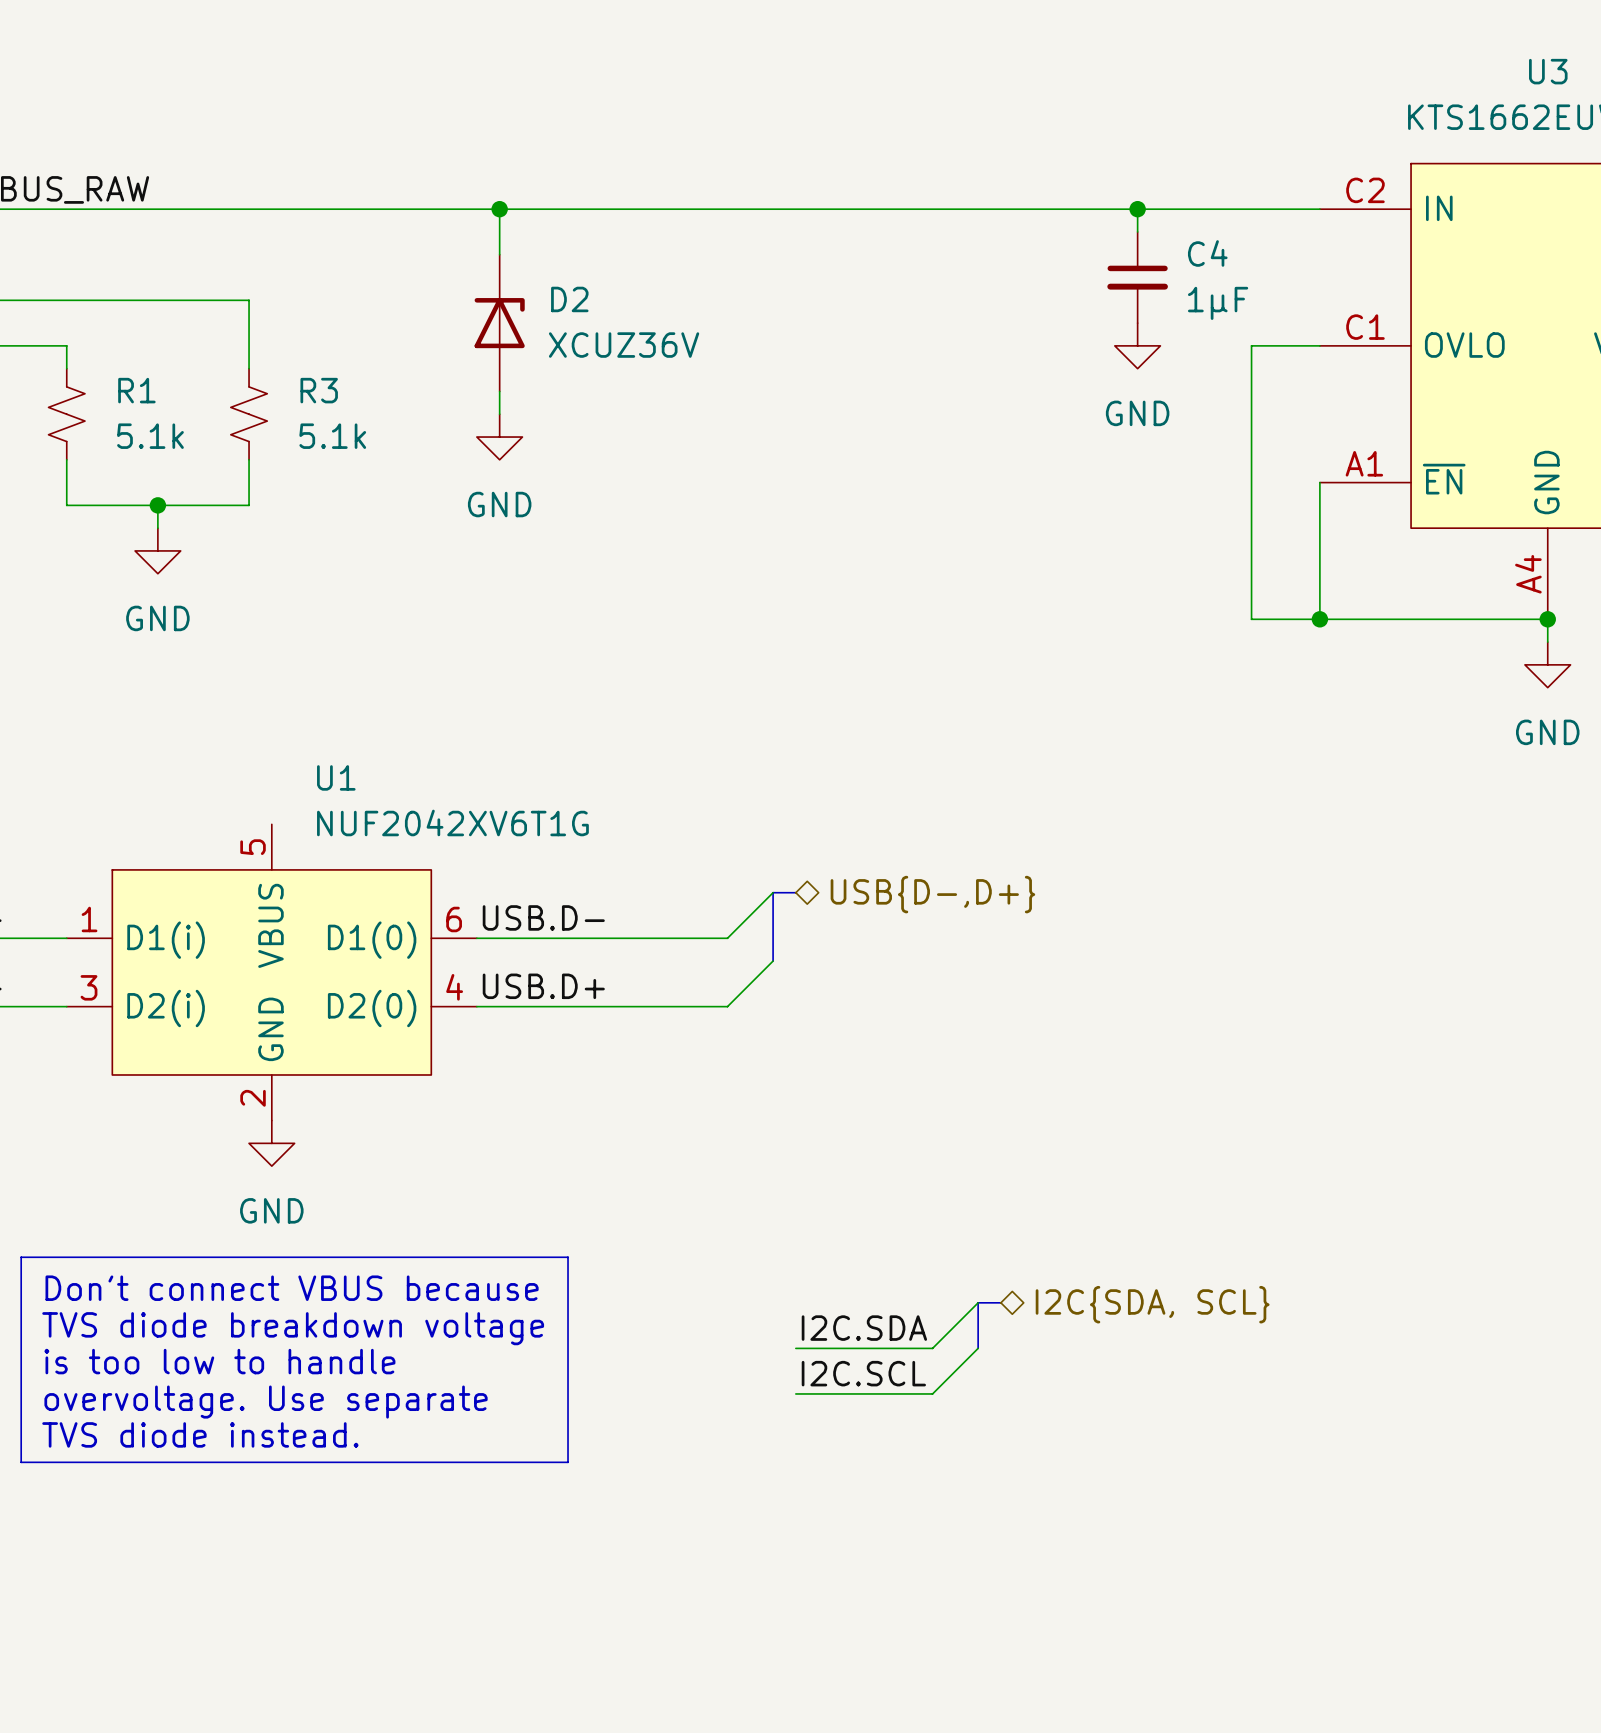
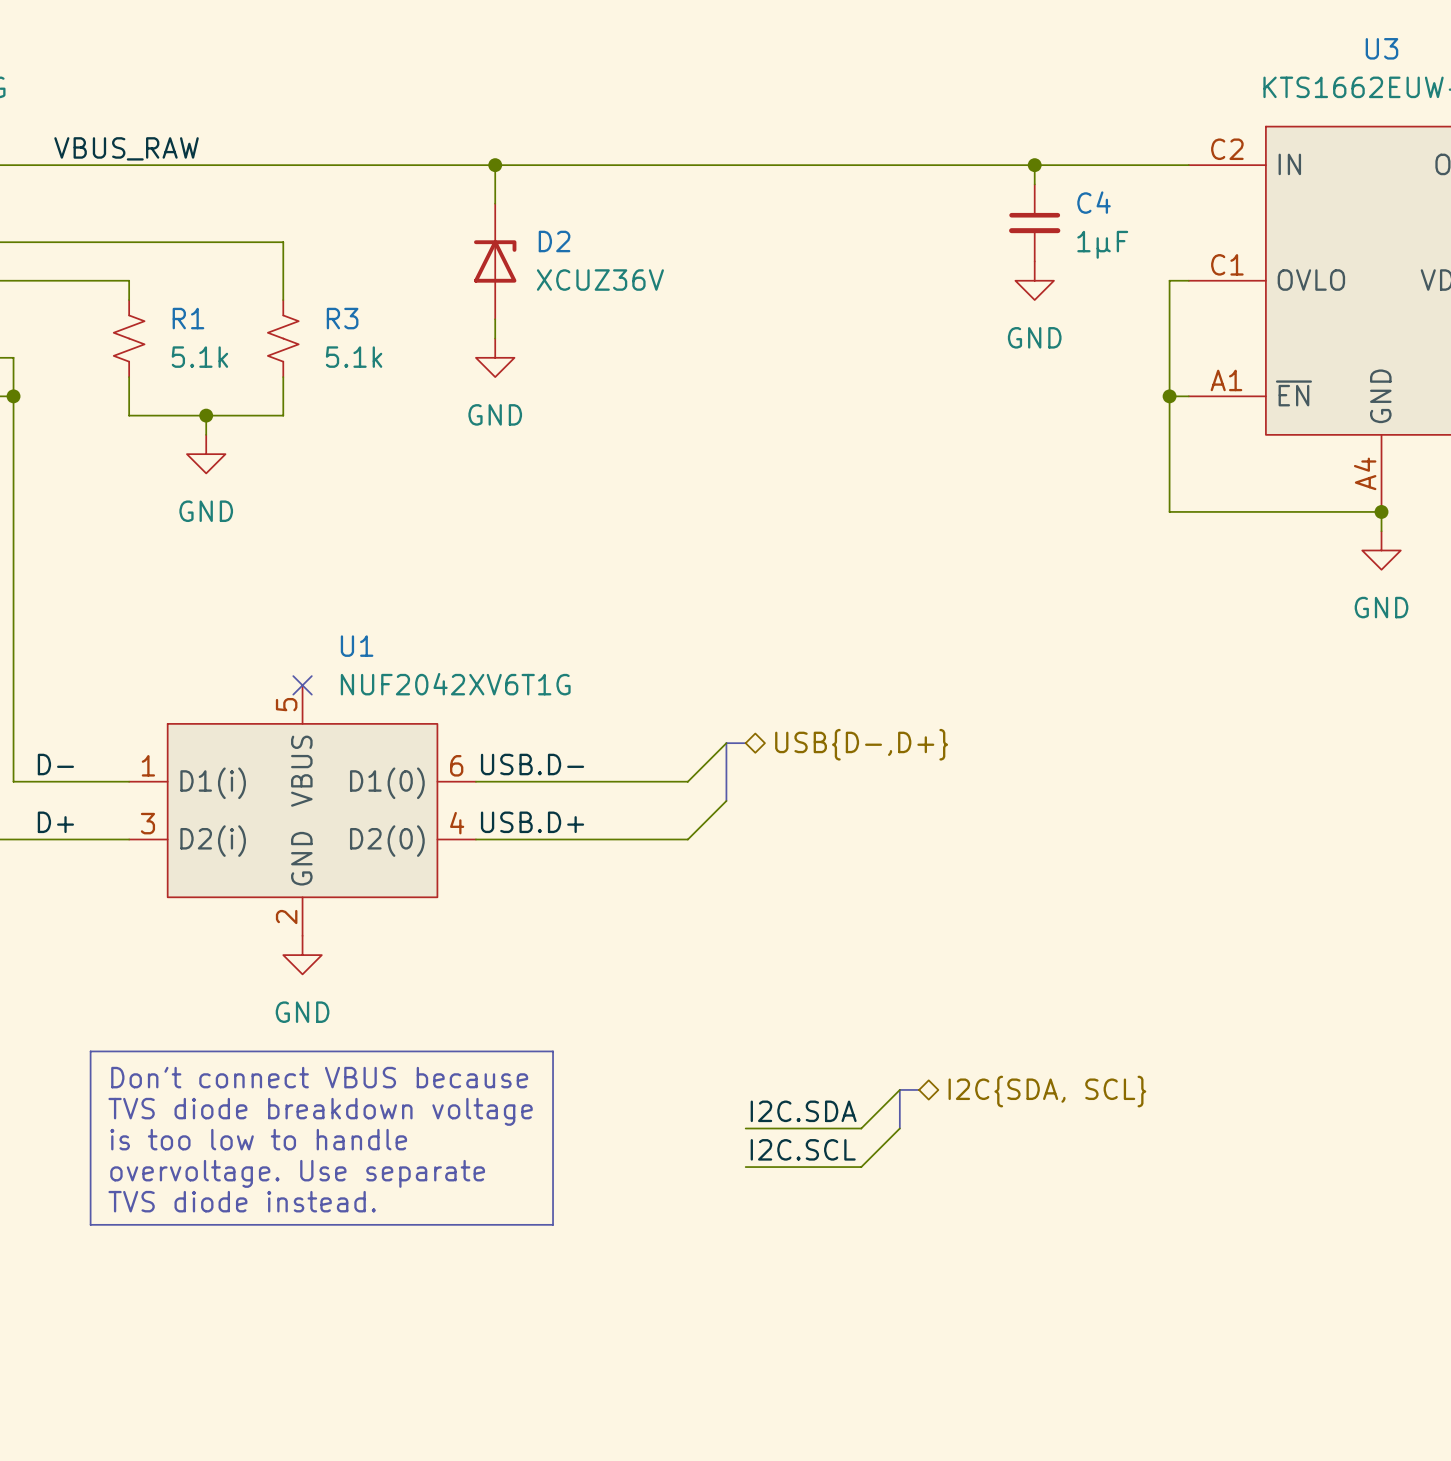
wire: (1297, 345) (1251, 345) (1251, 619) (1297, 619) -> (1169, 280) (1169, 511)
junction: none -> (1169, 396)
wire: (1319, 482) (1319, 619) -> (1188, 396) (1169, 396)
junction: (1319, 619) -> none
no-connect mark: none -> (302, 685)

